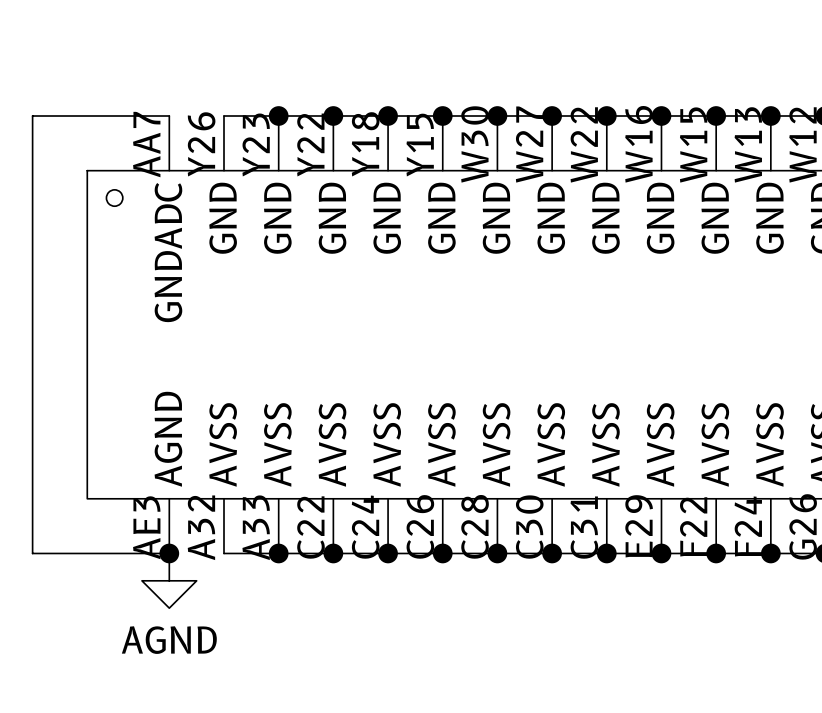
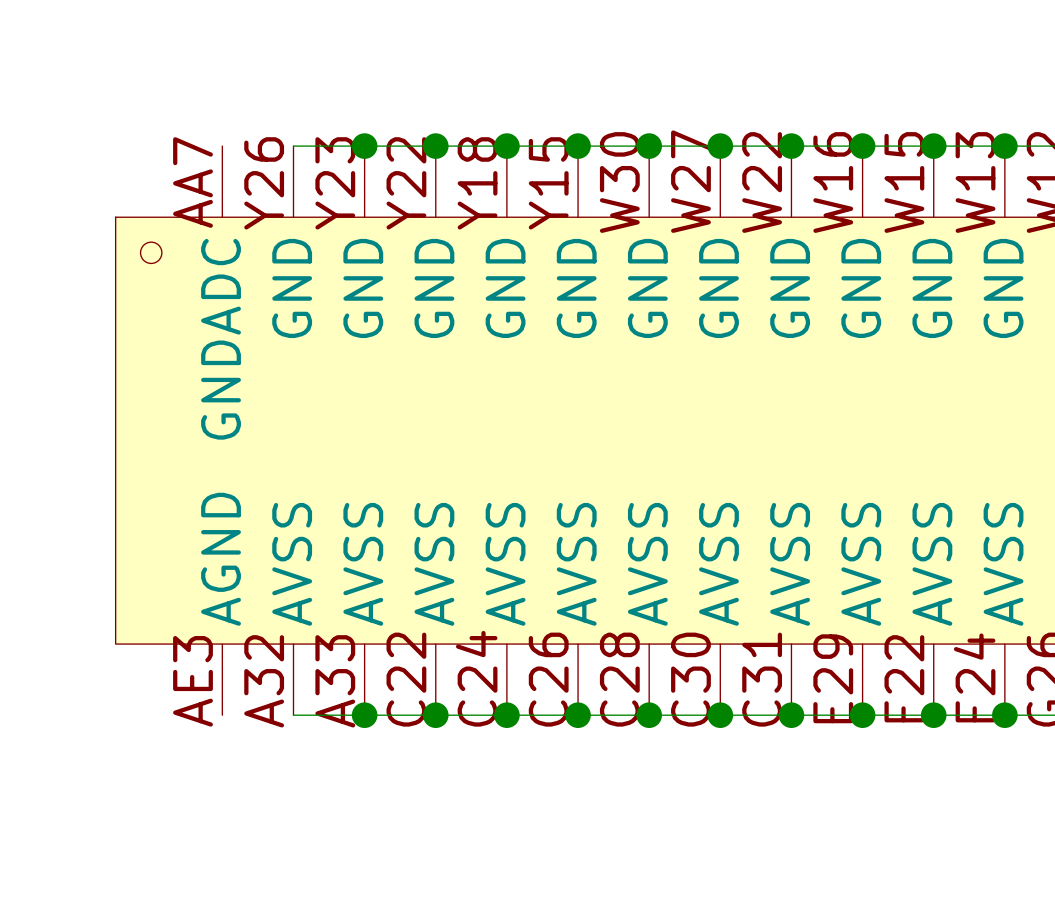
wire: (169, 116) (32, 116) (32, 553) (169, 553) -> none
junction: (169, 553) -> none
power symbol: AGND (169, 580) -> none

